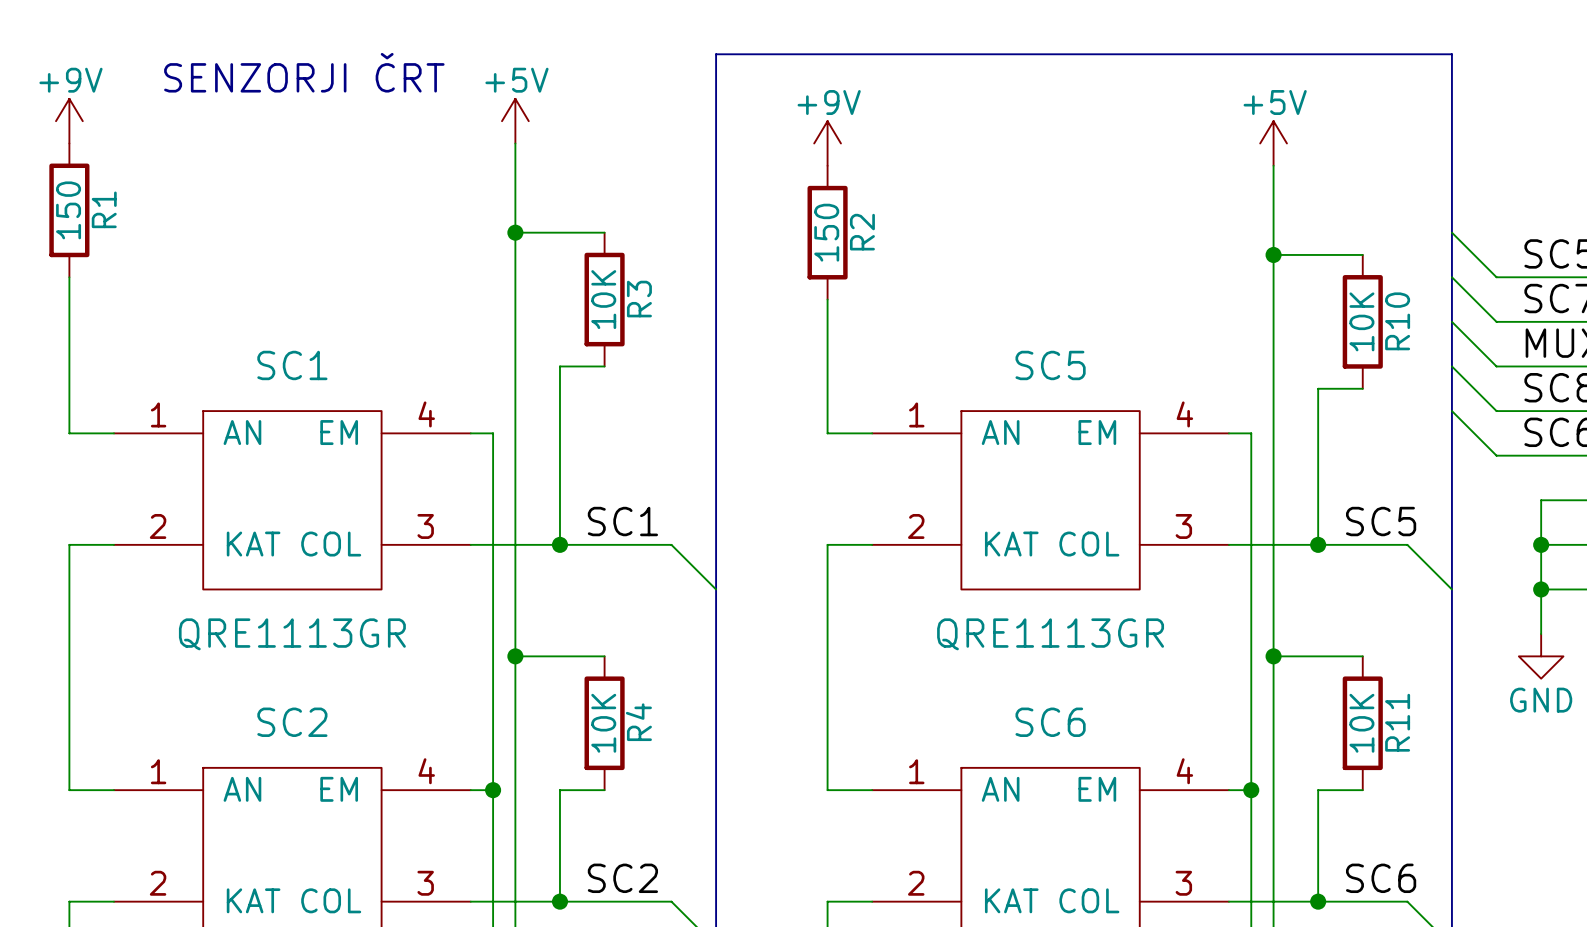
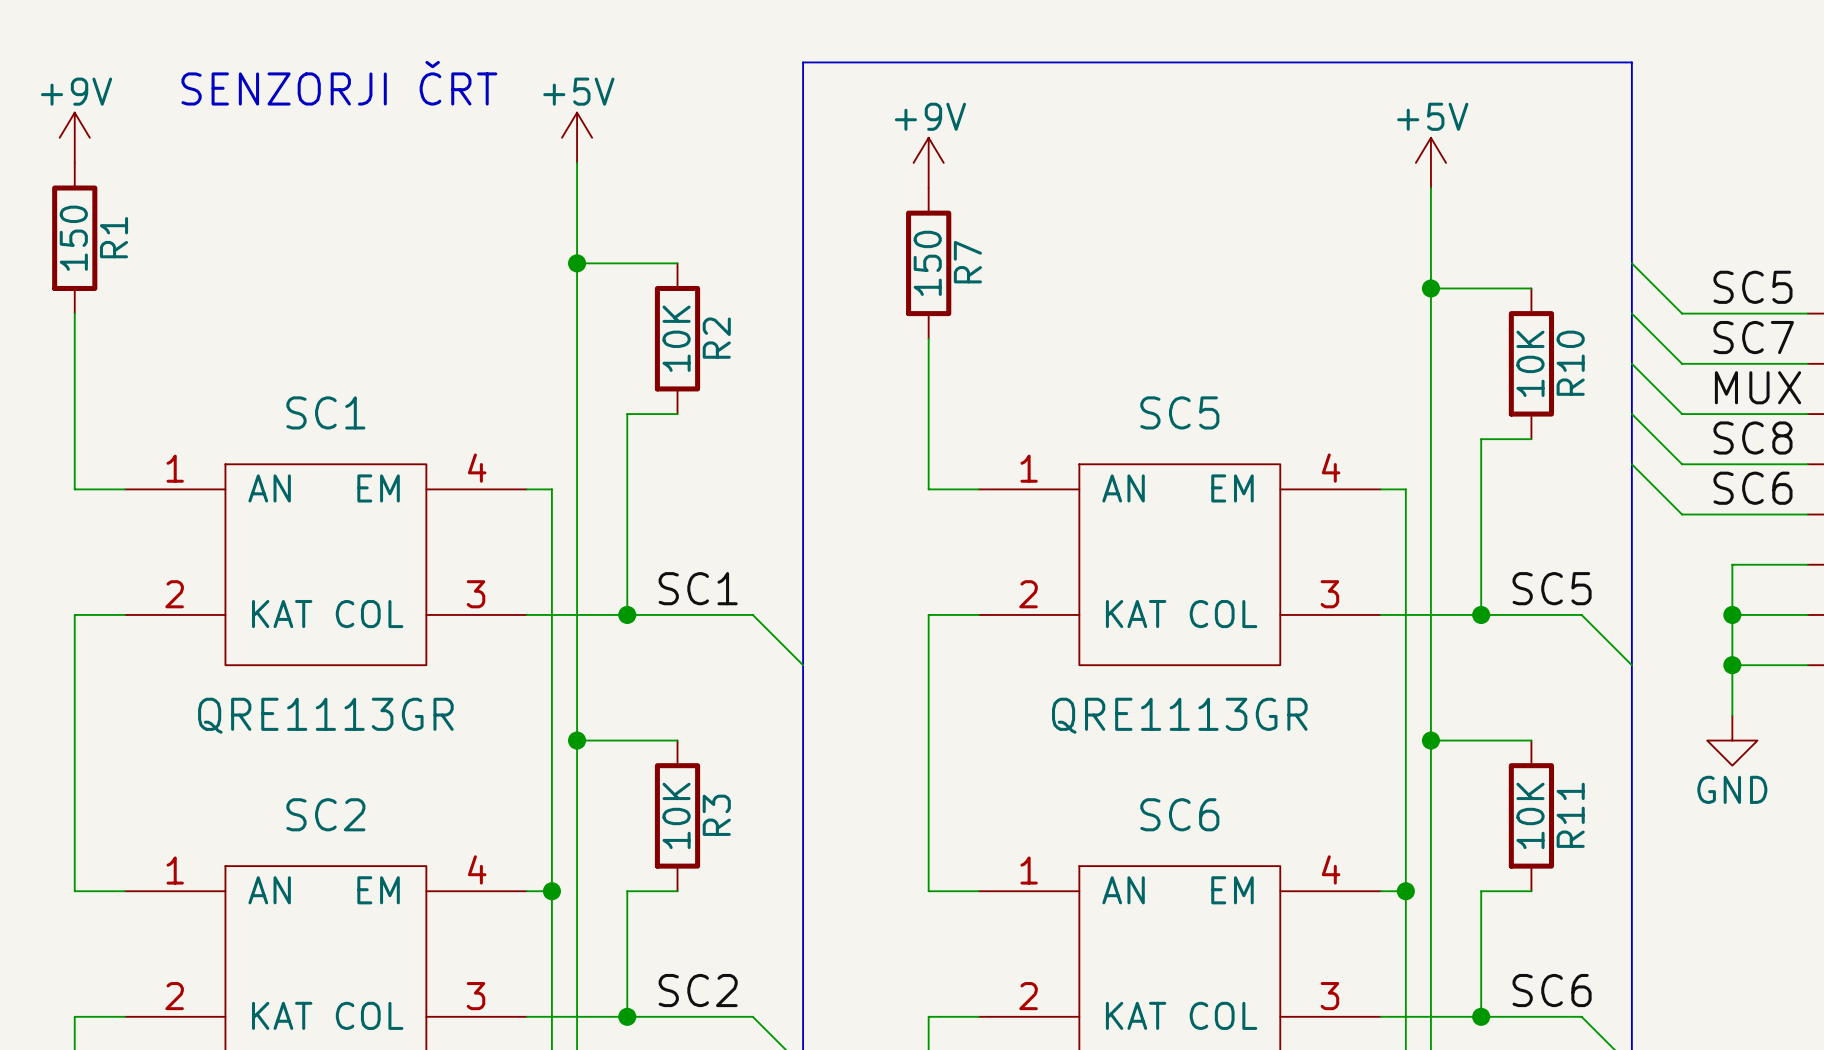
R2 name: R2 (862, 232) -> R7 (967, 262)
R3 name: R3 (639, 299) -> R2 (716, 338)
R4 name: R4 (638, 722) -> R3 (716, 815)

